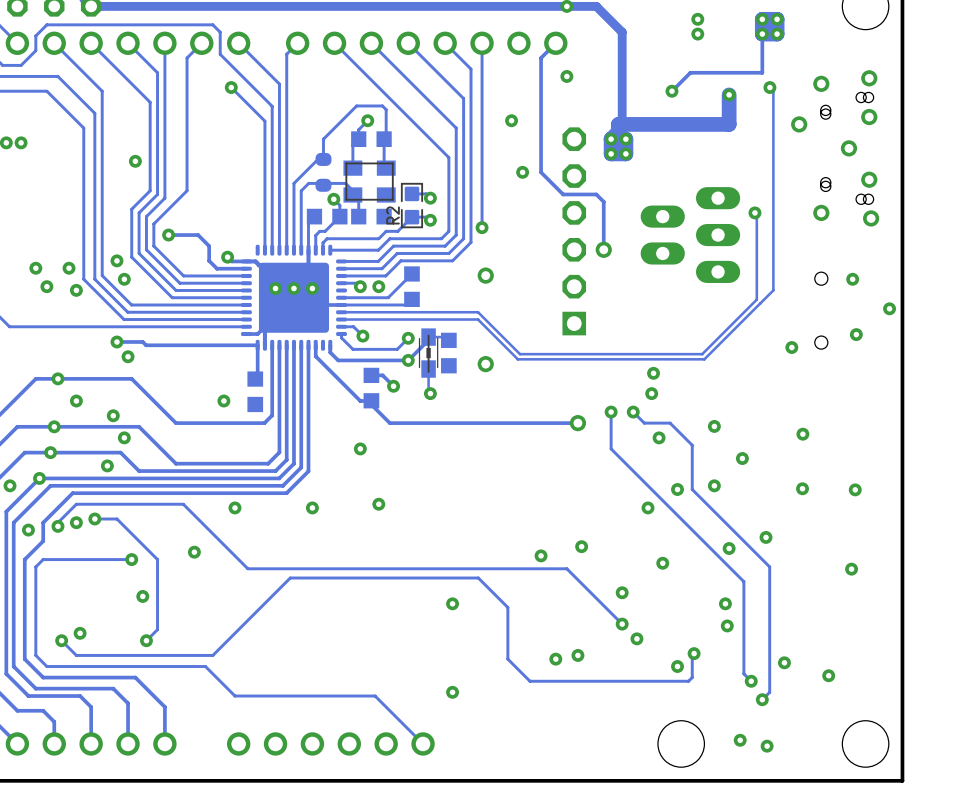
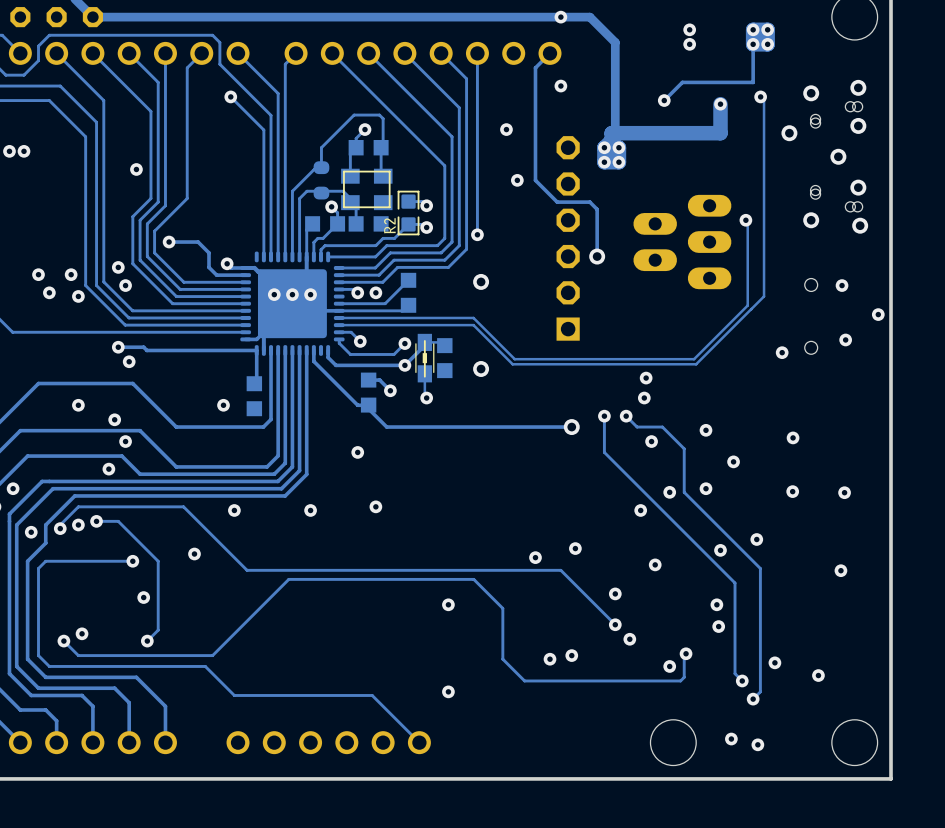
via: (57, 378) -> none
via: (54, 426) -> none
via: (50, 452) -> none
via: (39, 478) -> none

